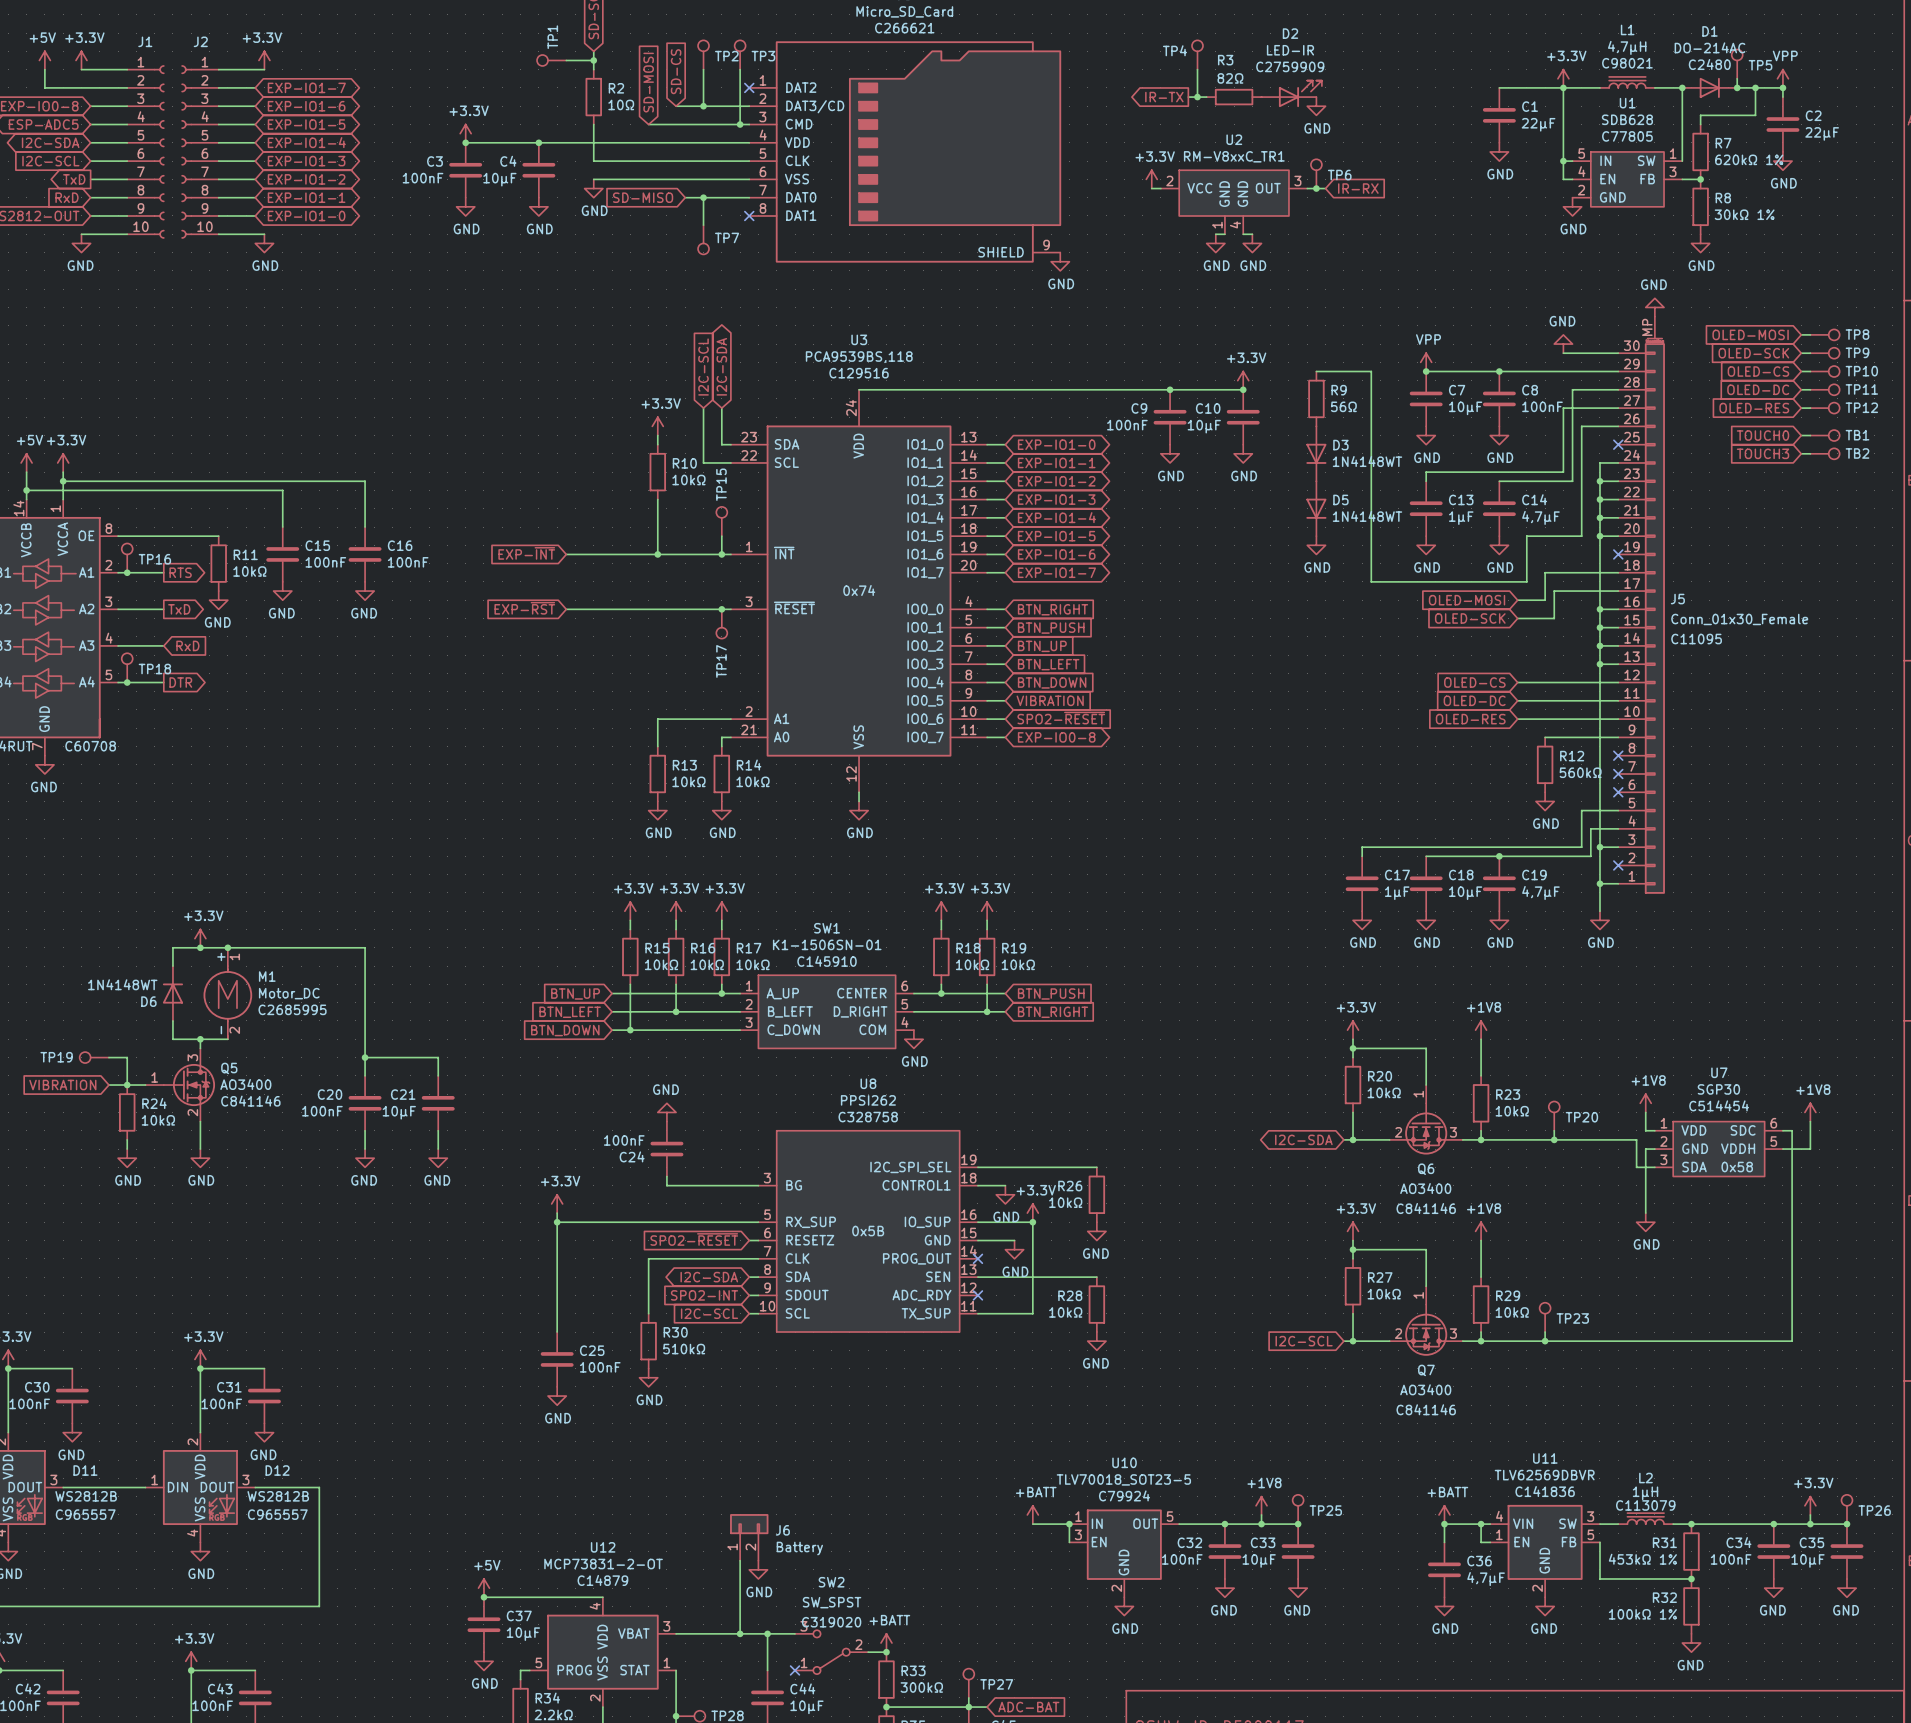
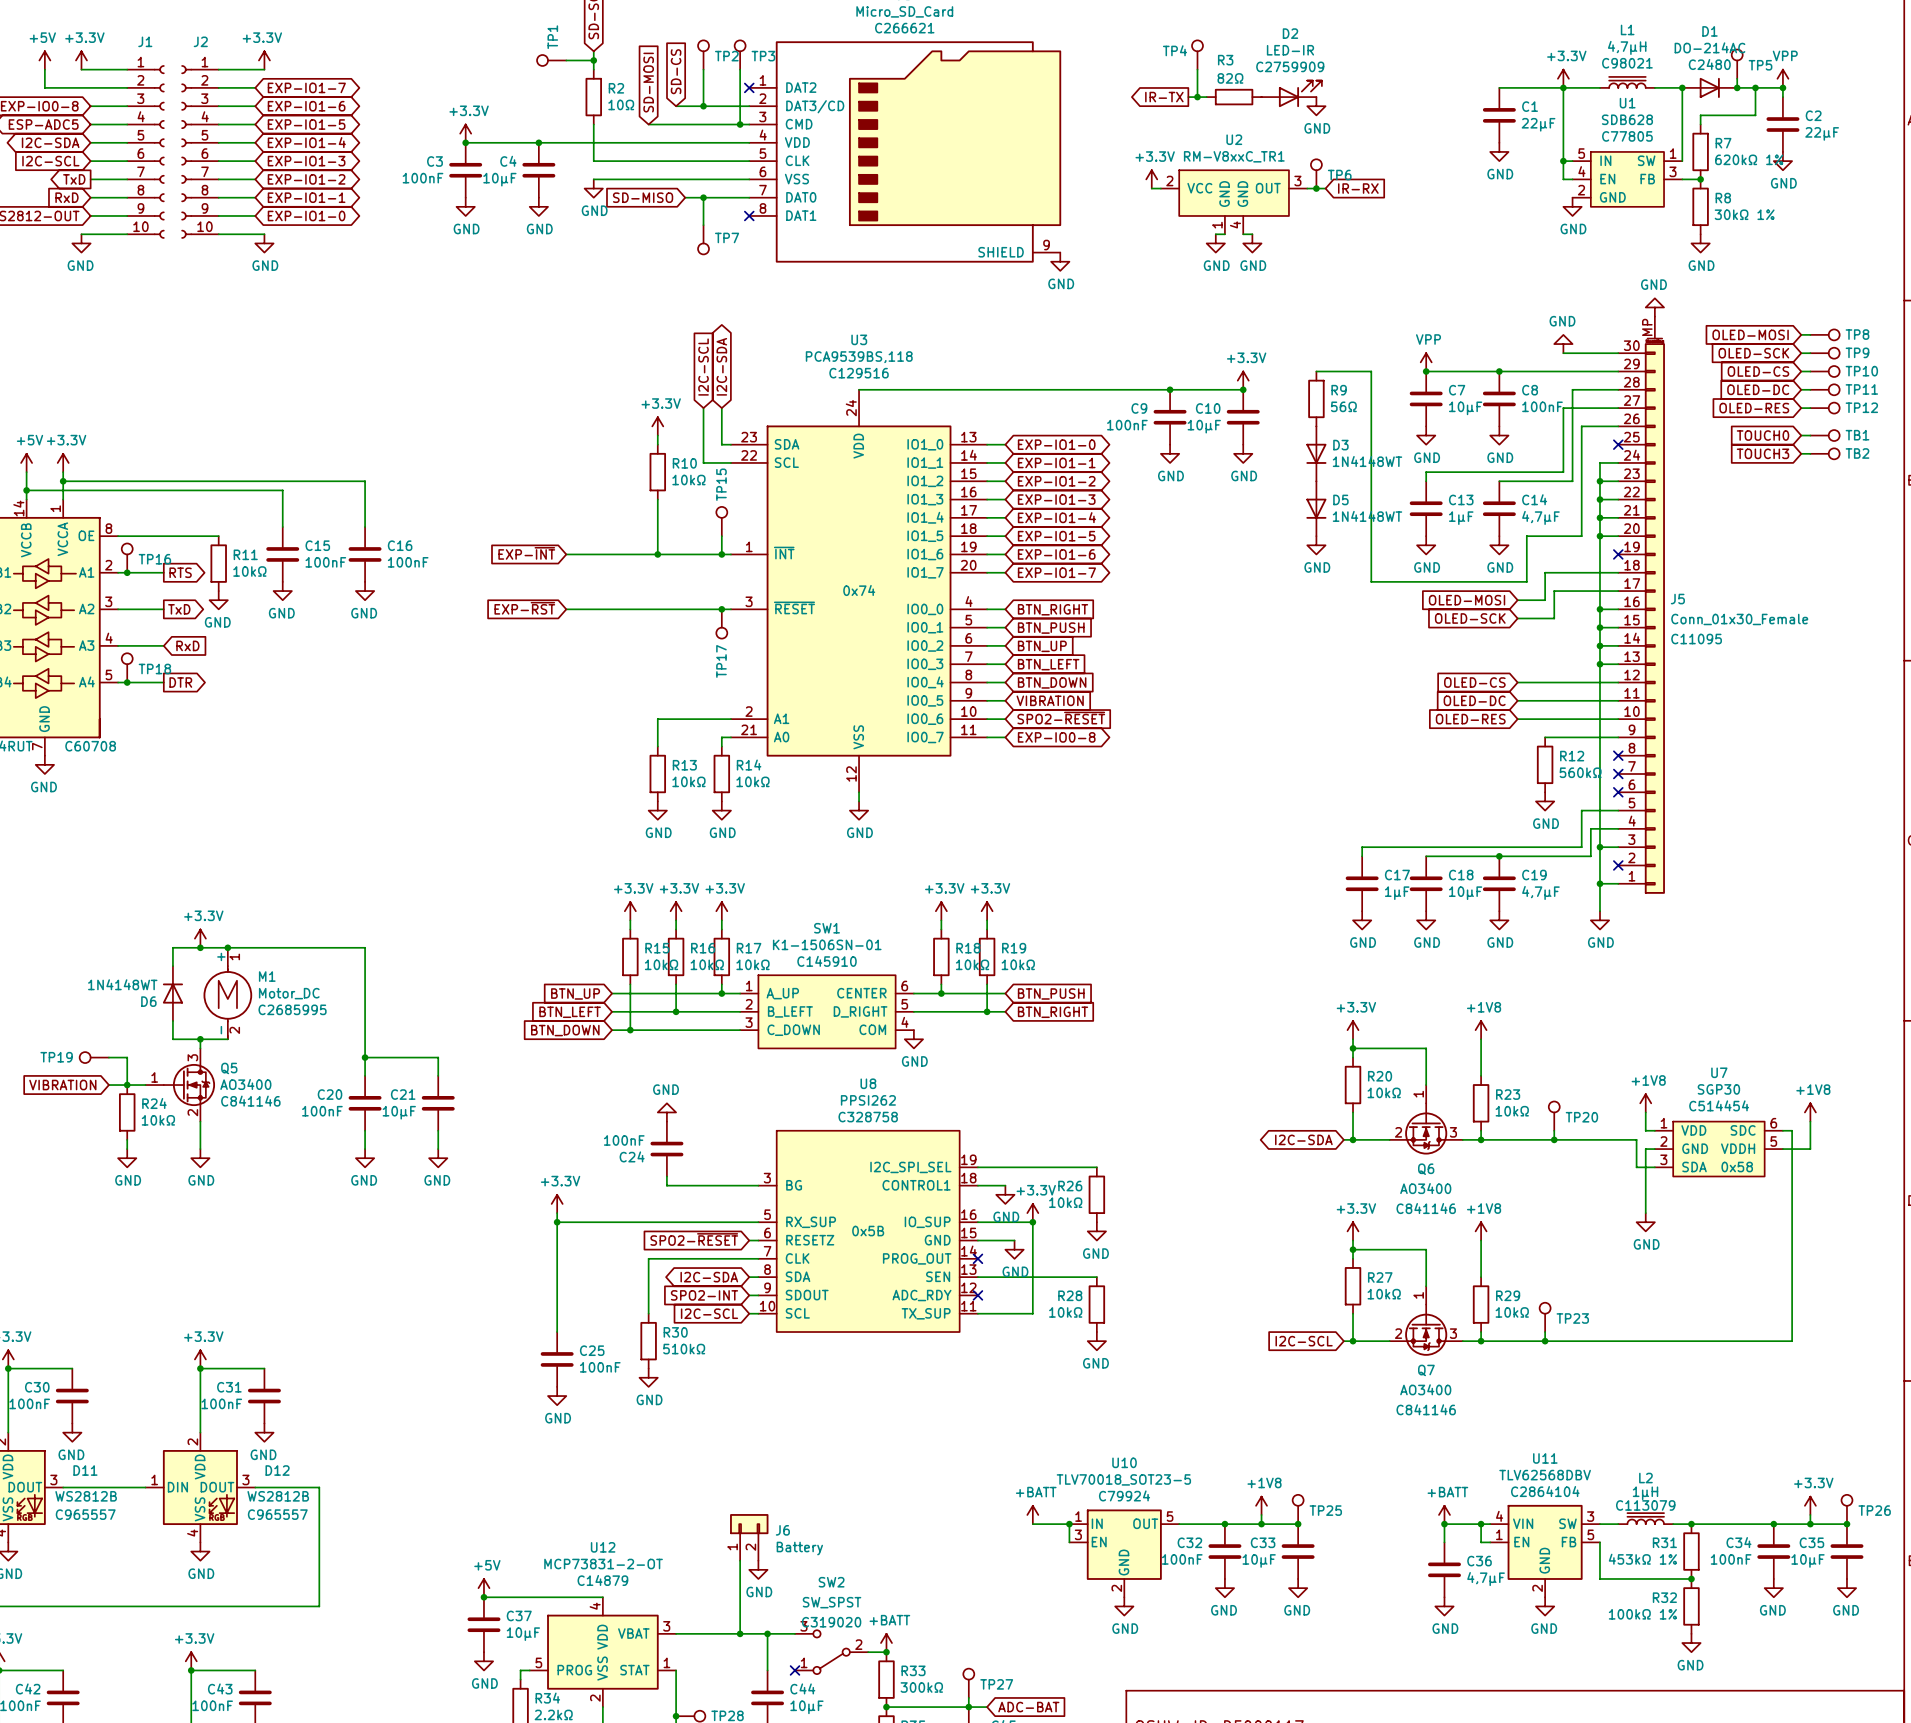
U11 value: TLV62569DBVR (1544, 1475) -> TLV62568DBV (1545, 1475)
U11 text: C141836 (1545, 1491) -> C2864104 (1545, 1491)

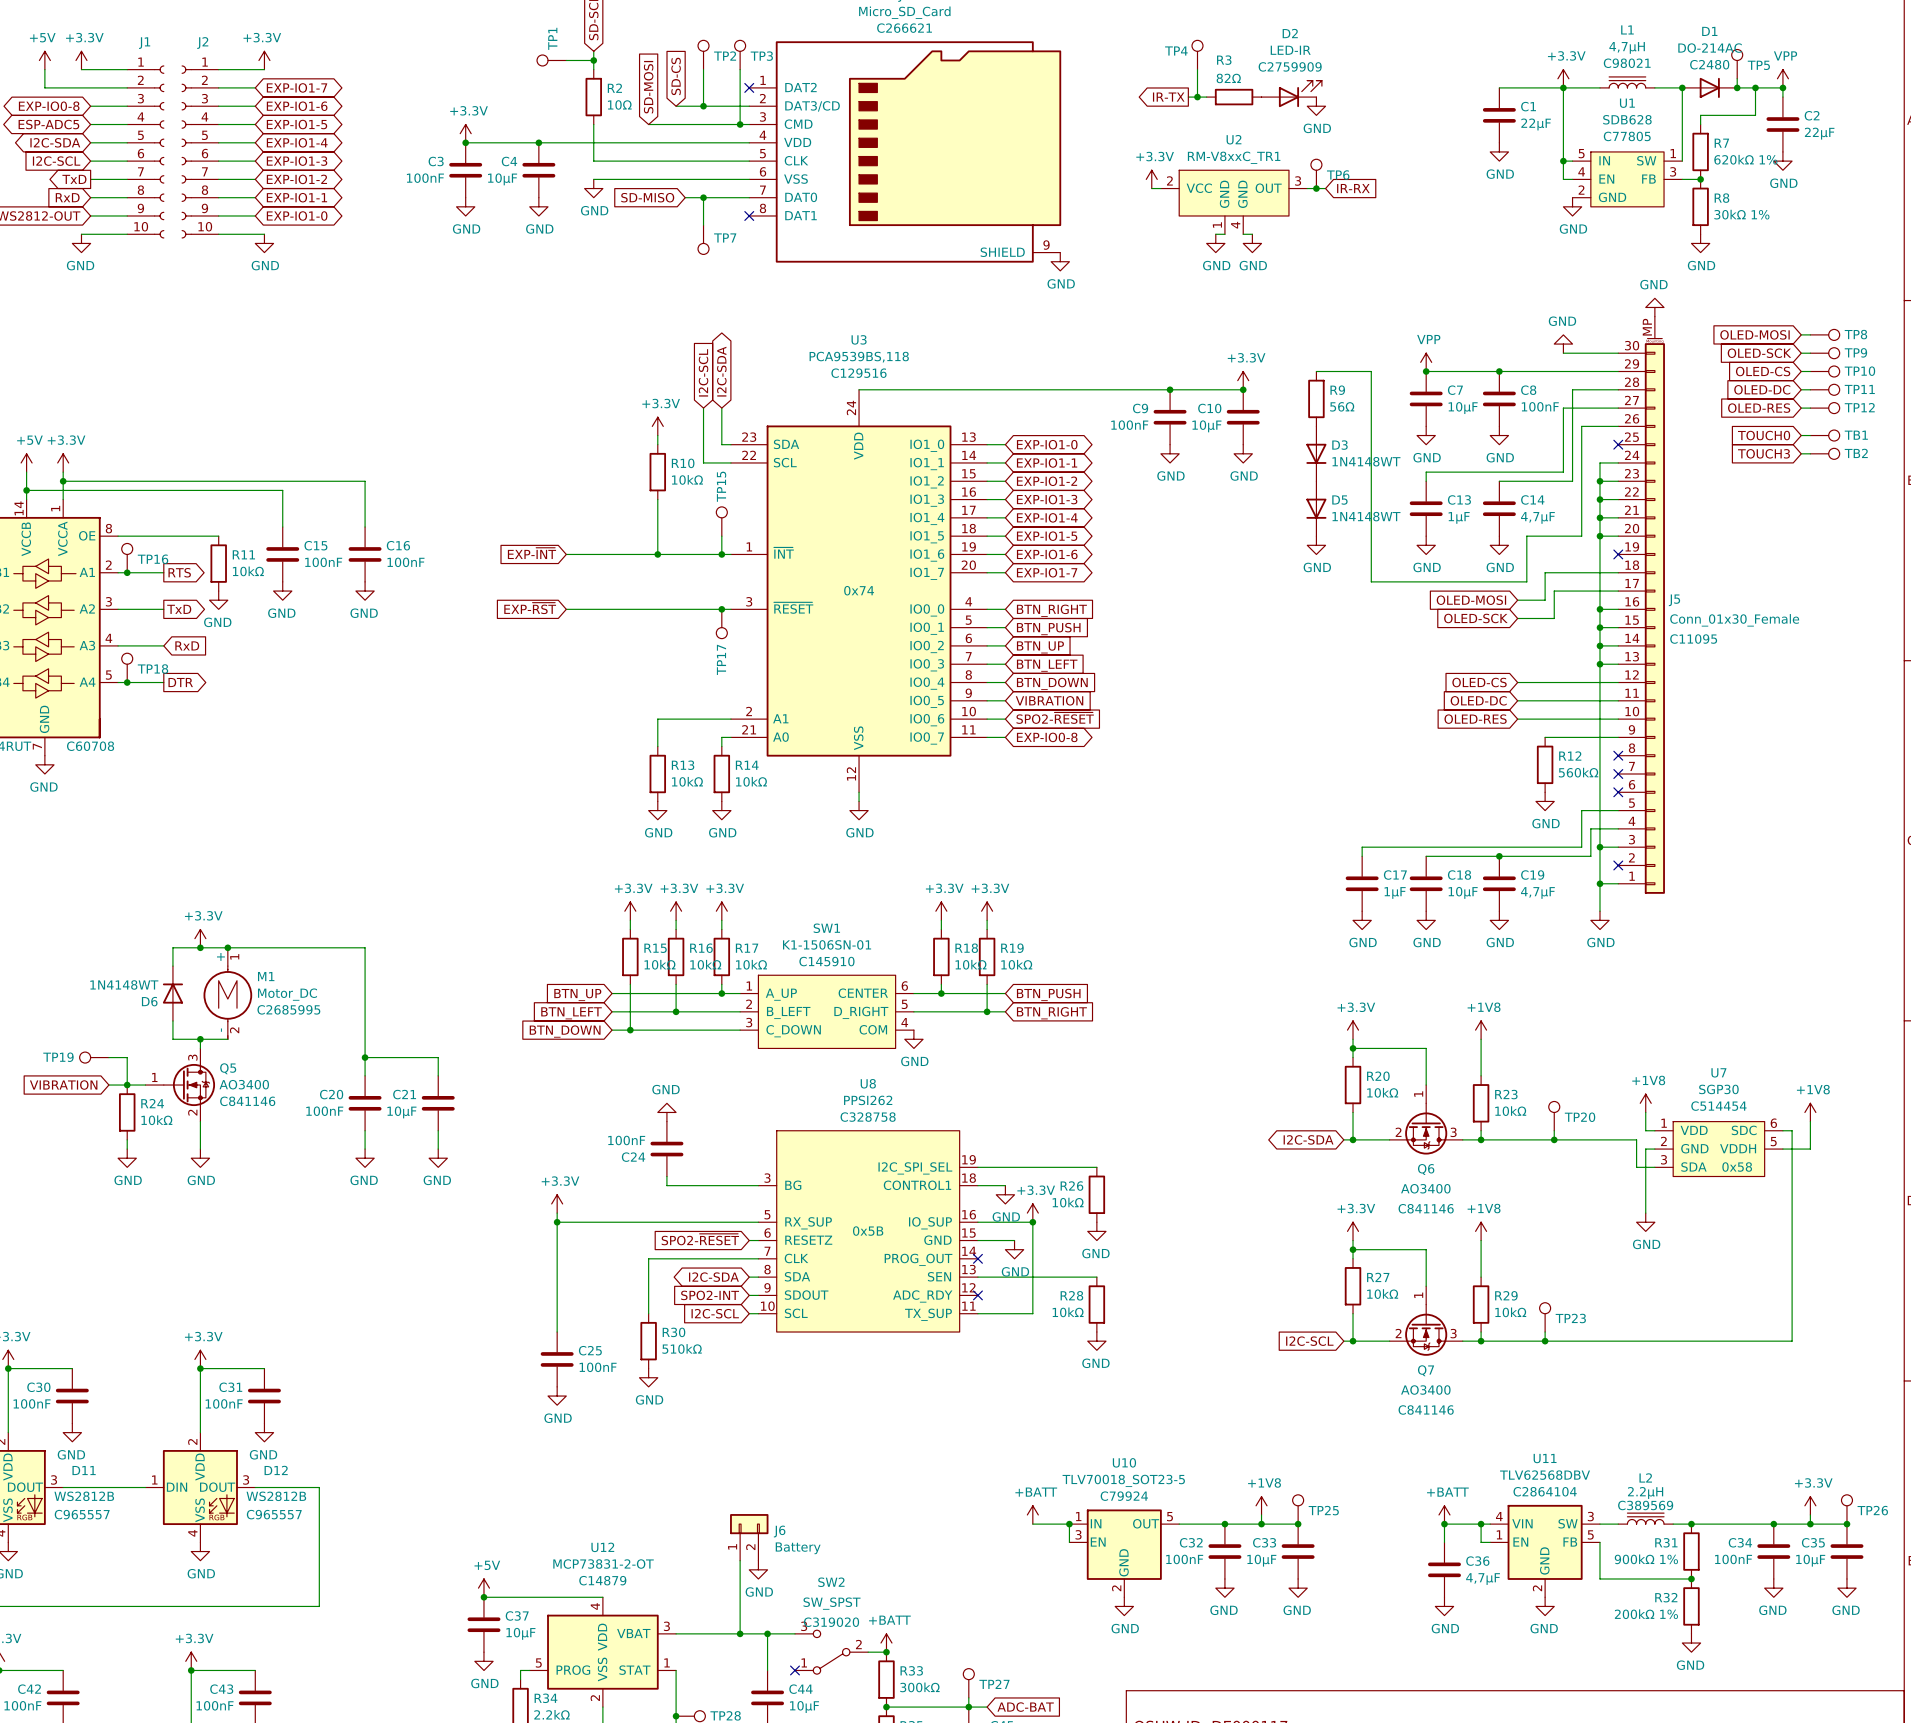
L2 value: 1µH (1645, 1493) -> 2.2µH (1645, 1492)
L2 text: C113079 (1645, 1505) -> C389569 (1645, 1505)
R31 value: 453kΩ 1% (1642, 1559) -> 900kΩ 1% (1646, 1559)
R32 value: 100kΩ 1% (1642, 1614) -> 200kΩ 1% (1646, 1614)

